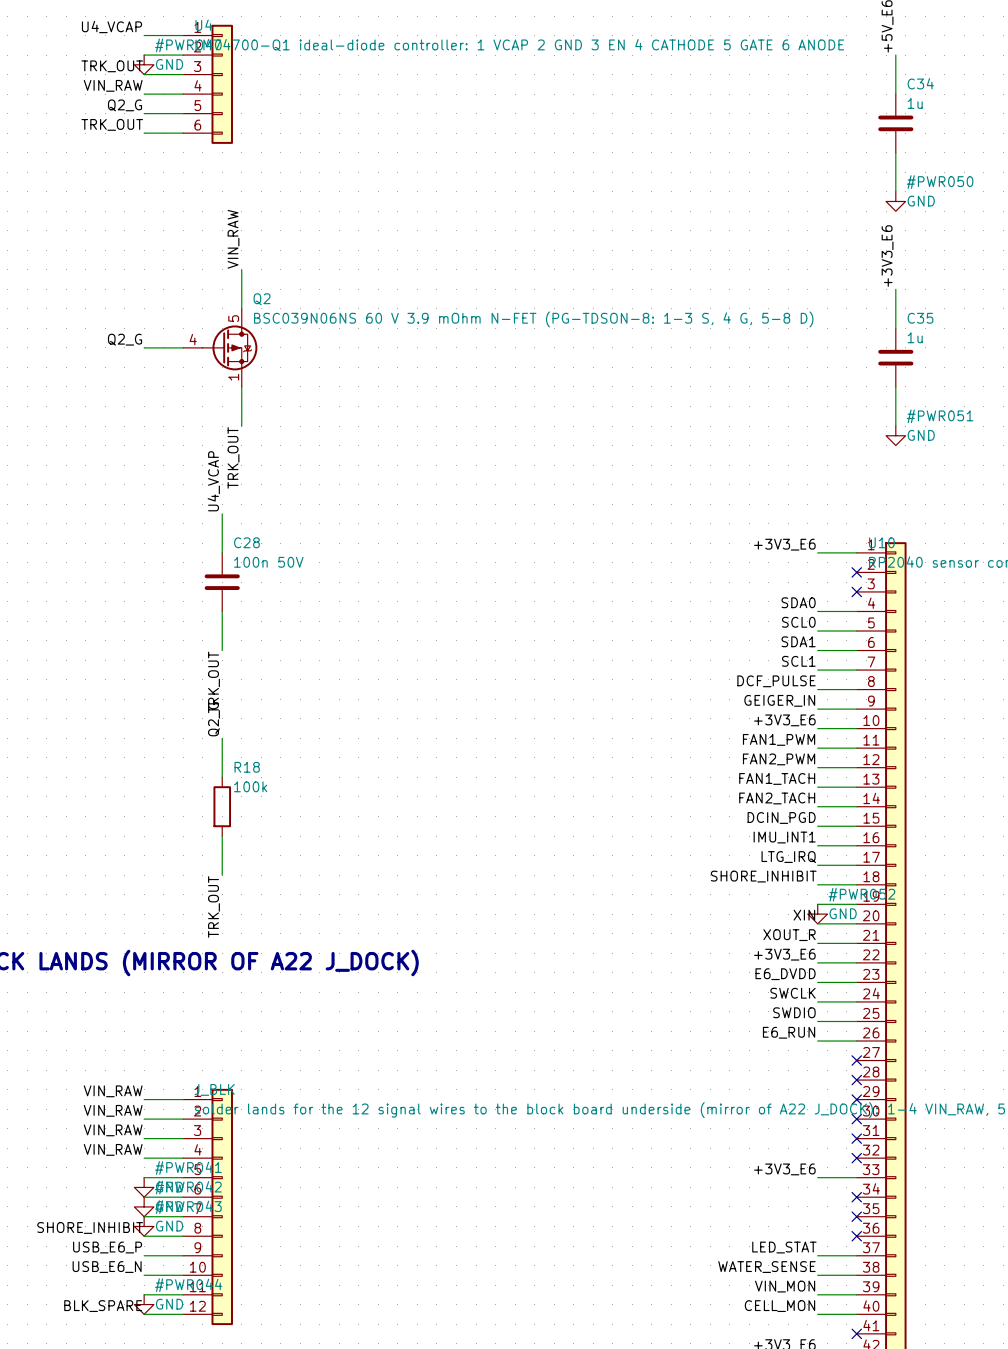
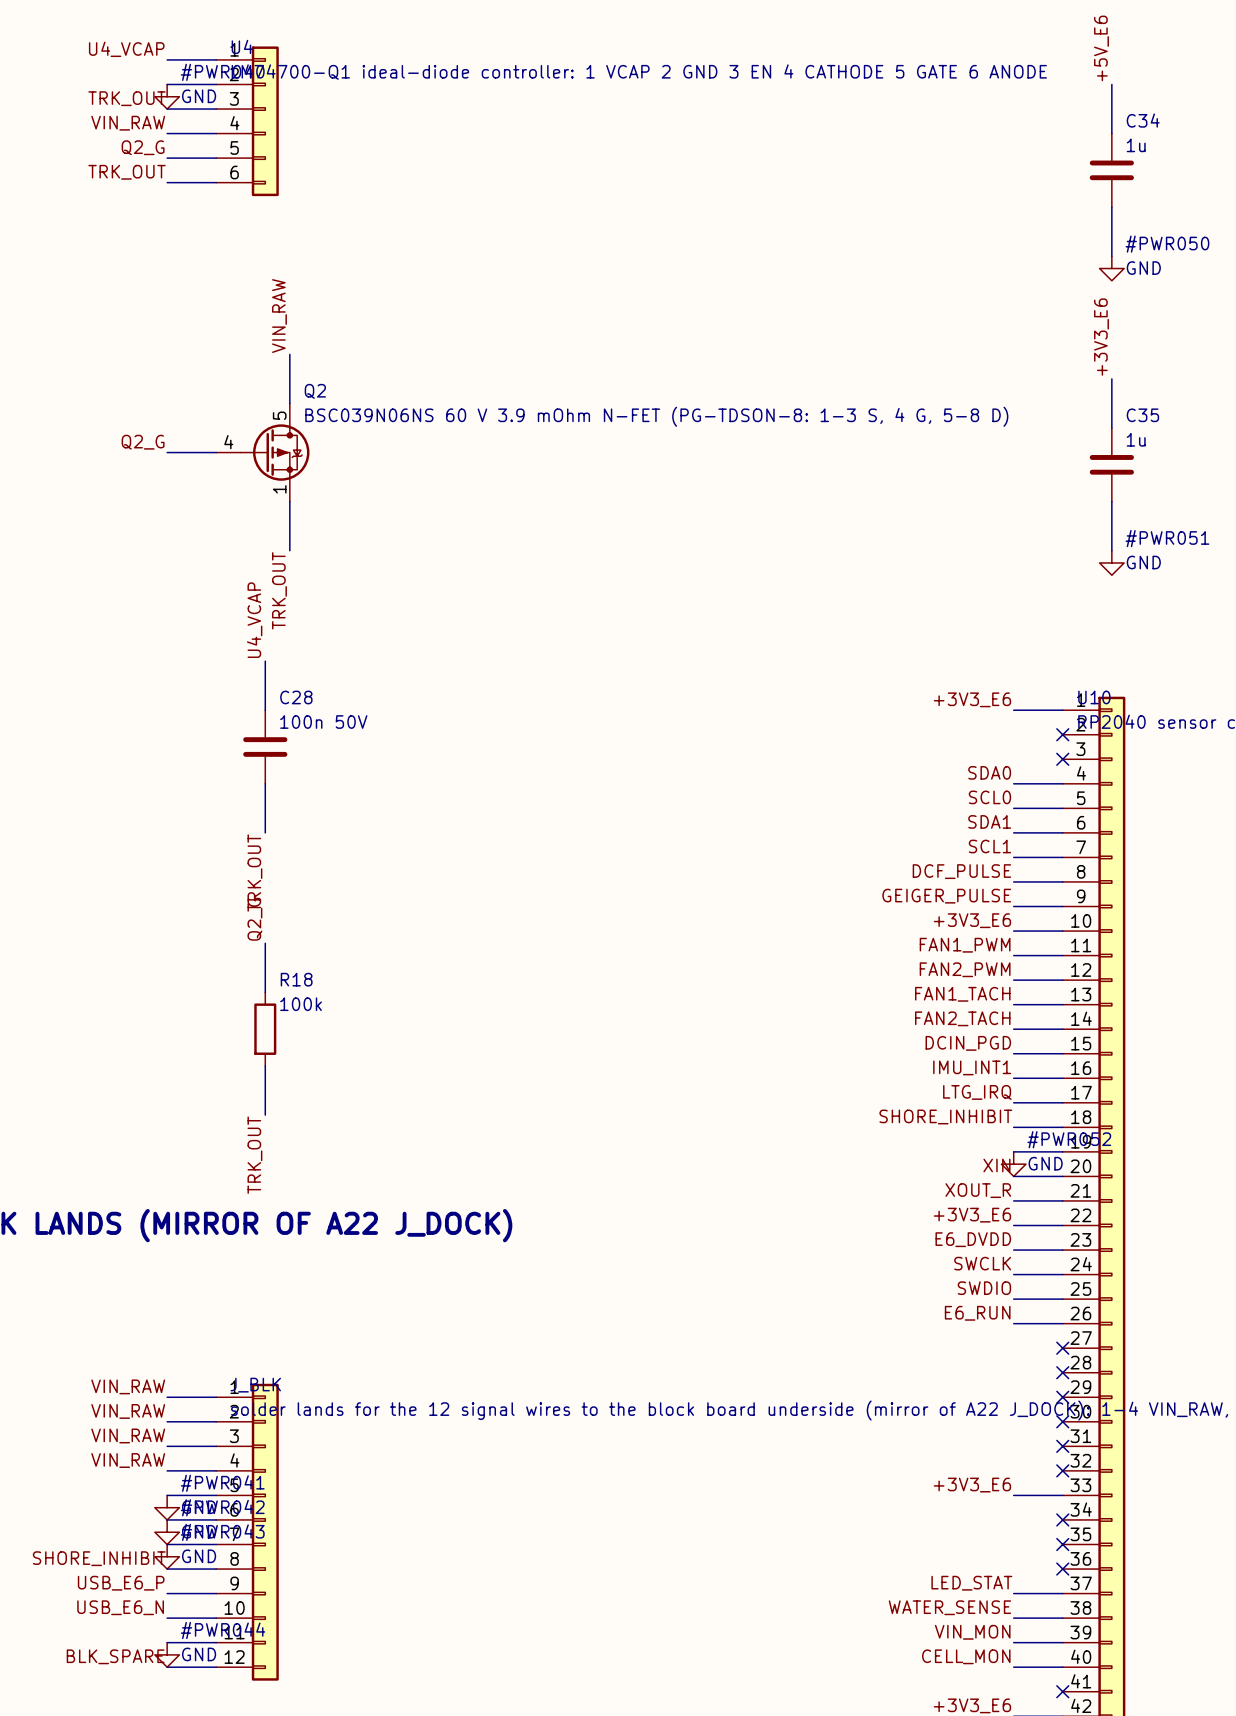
label: GEIGER_IN (779, 700) -> GEIGER_PULSE (946, 896)

